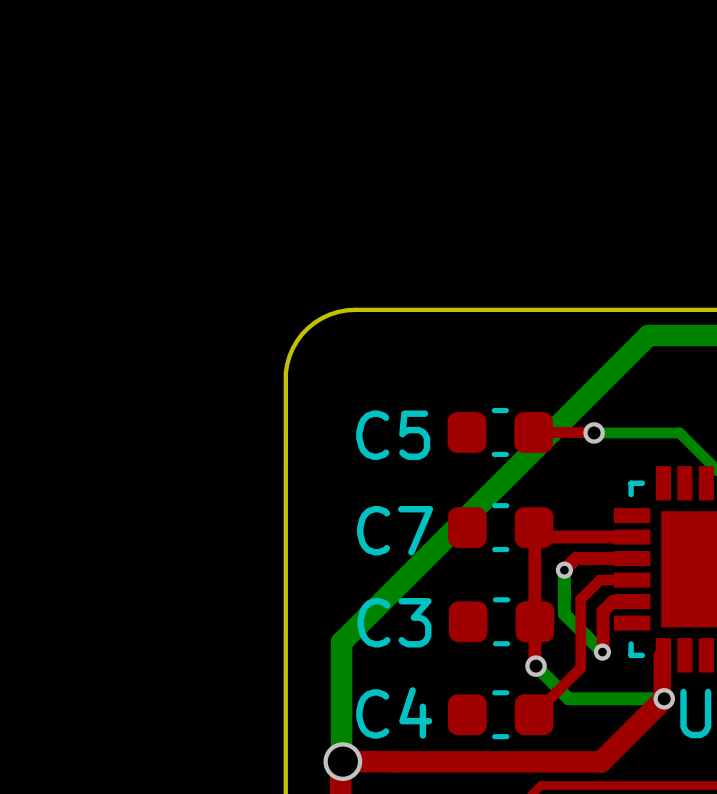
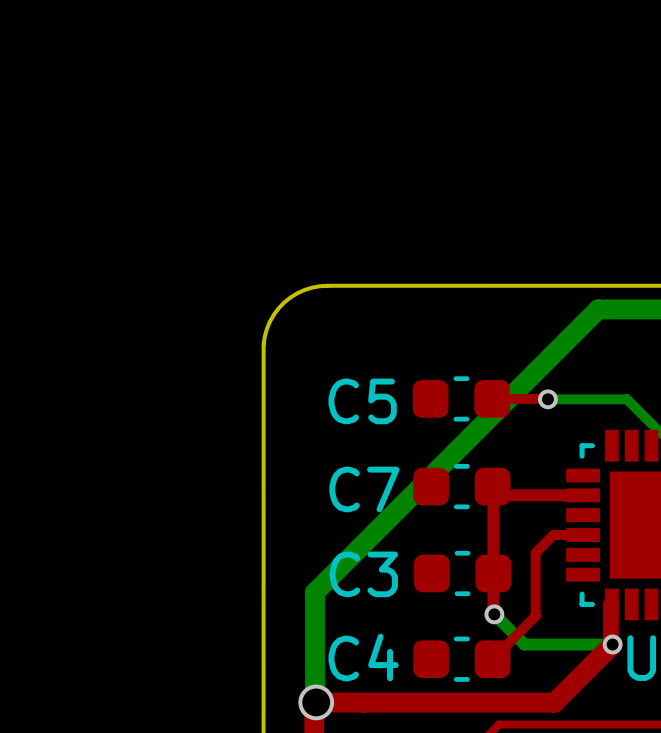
top track: (632, 558) (576, 558) (564, 570) -> none
bottom track: (564, 570) (564, 614) (602, 652) -> none
via: (564, 570) -> none
top track: (632, 601) (613, 601) (603, 611) (602, 652) -> none
via: (602, 652) -> none

